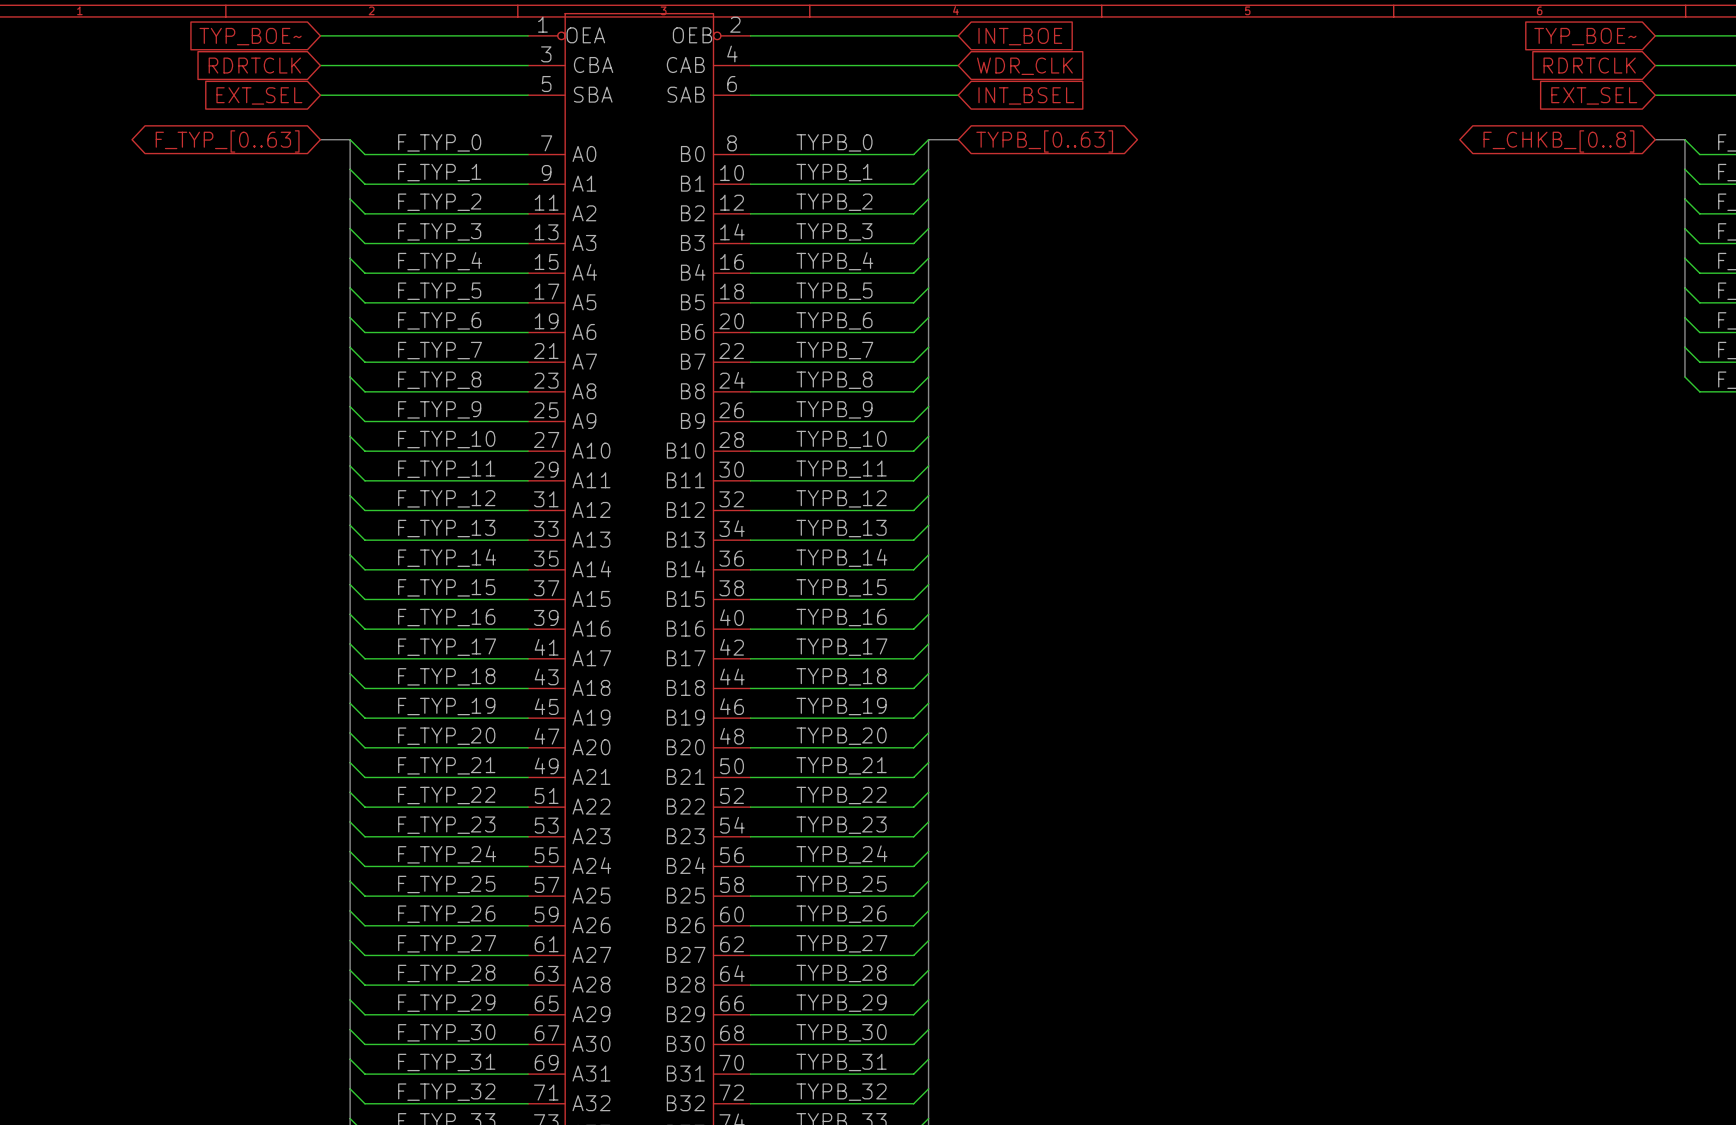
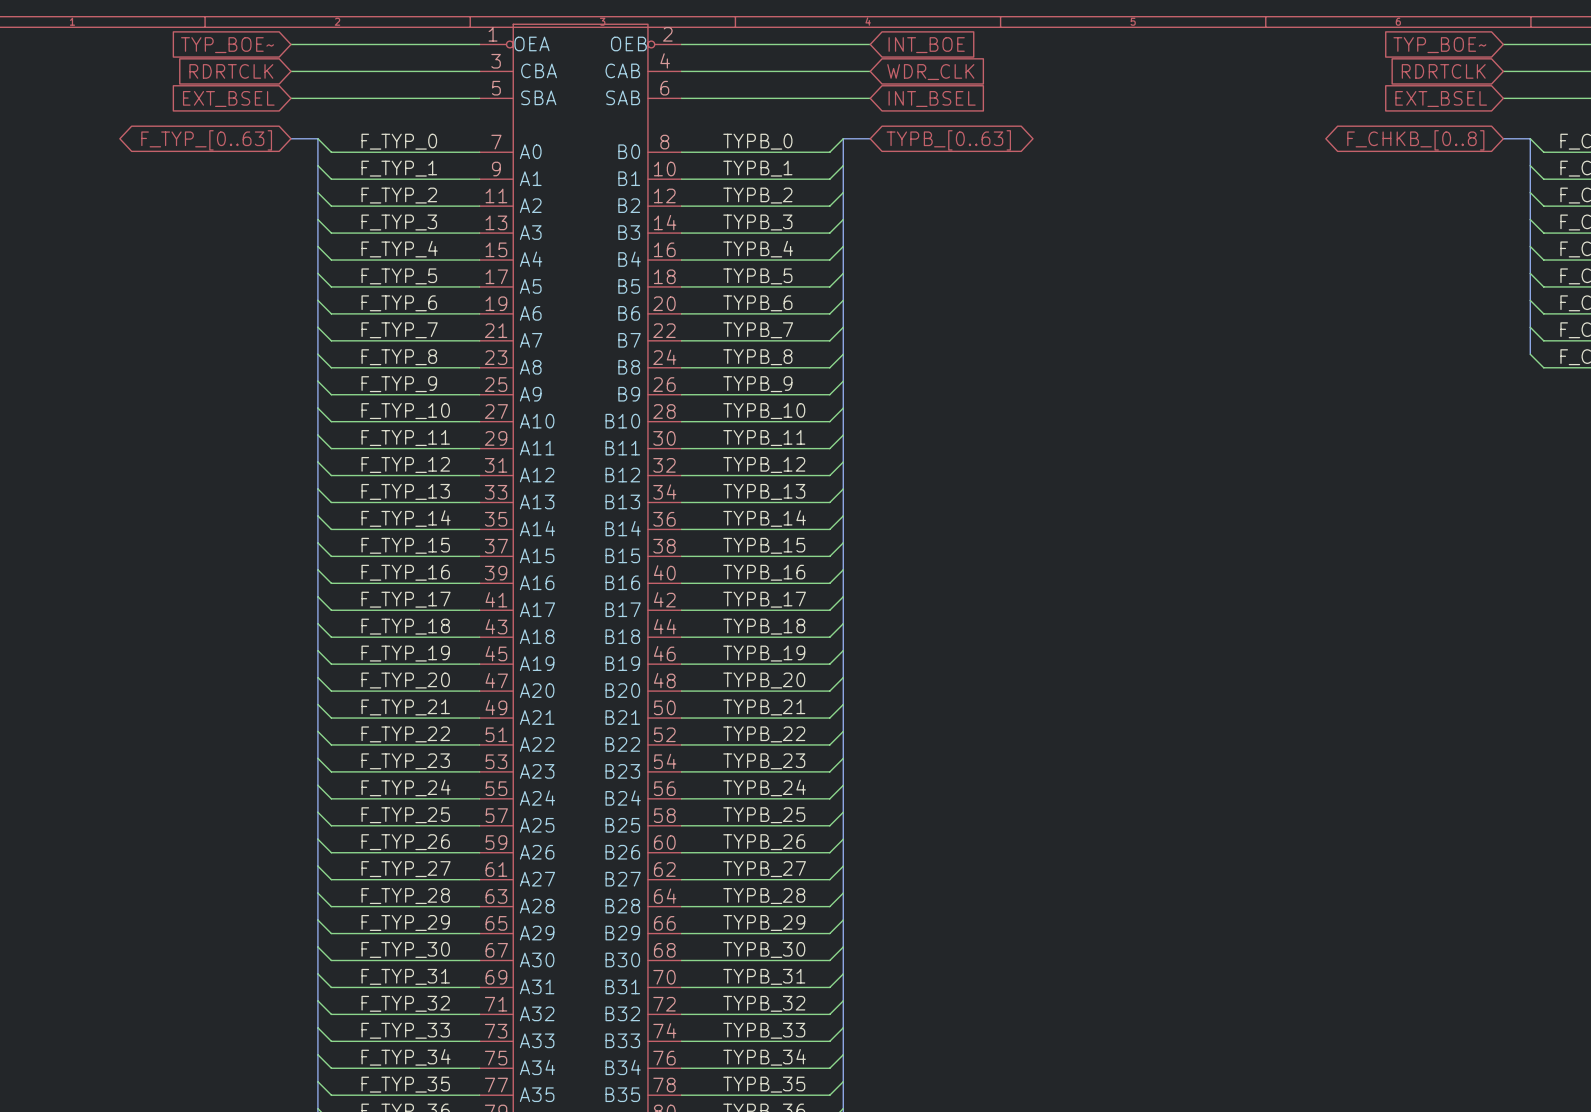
global label: EXT_SEL (259, 95) -> EXT_BSEL (228, 99)
global label: EXT_SEL (1594, 95) -> EXT_BSEL (1441, 99)

